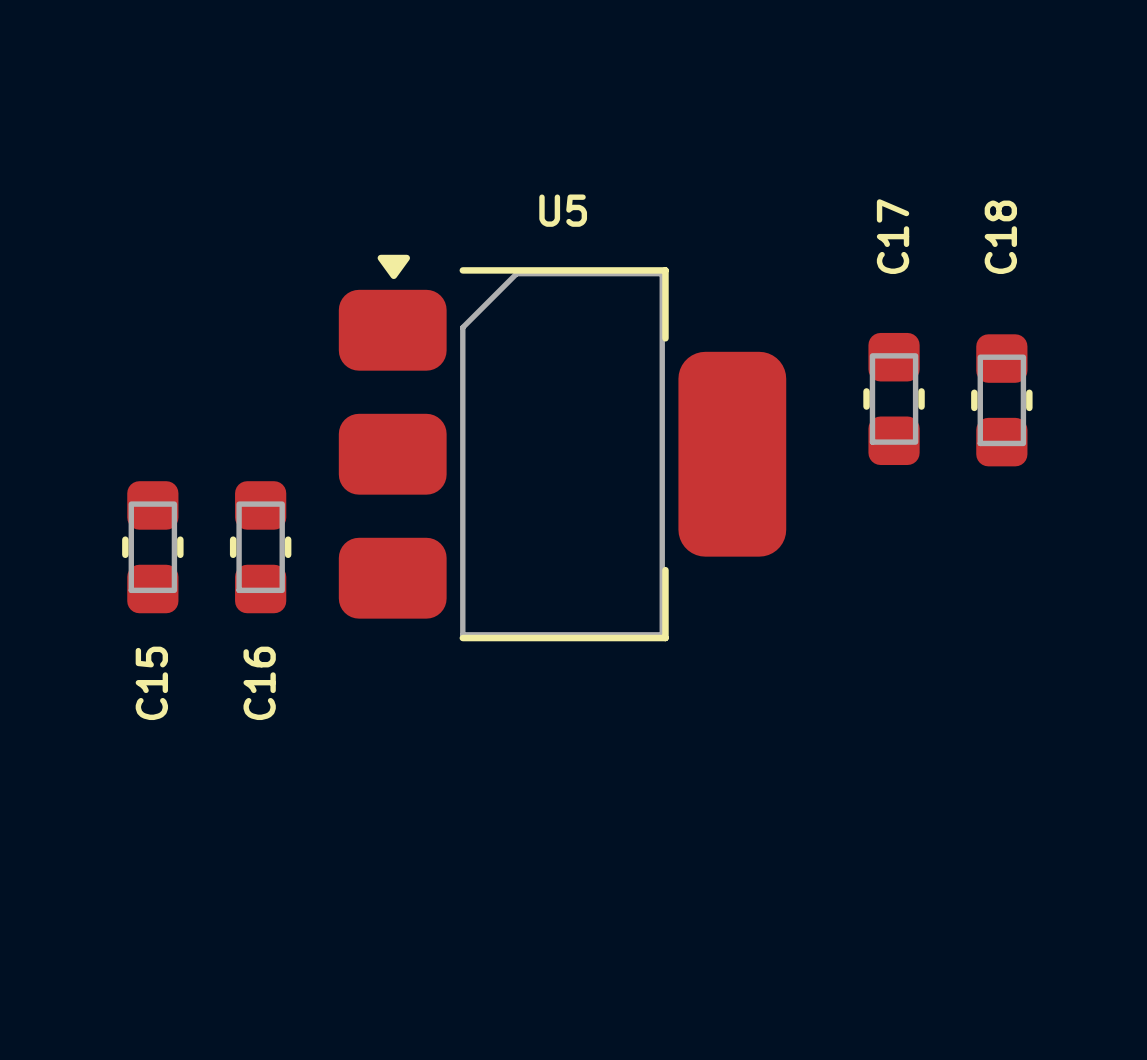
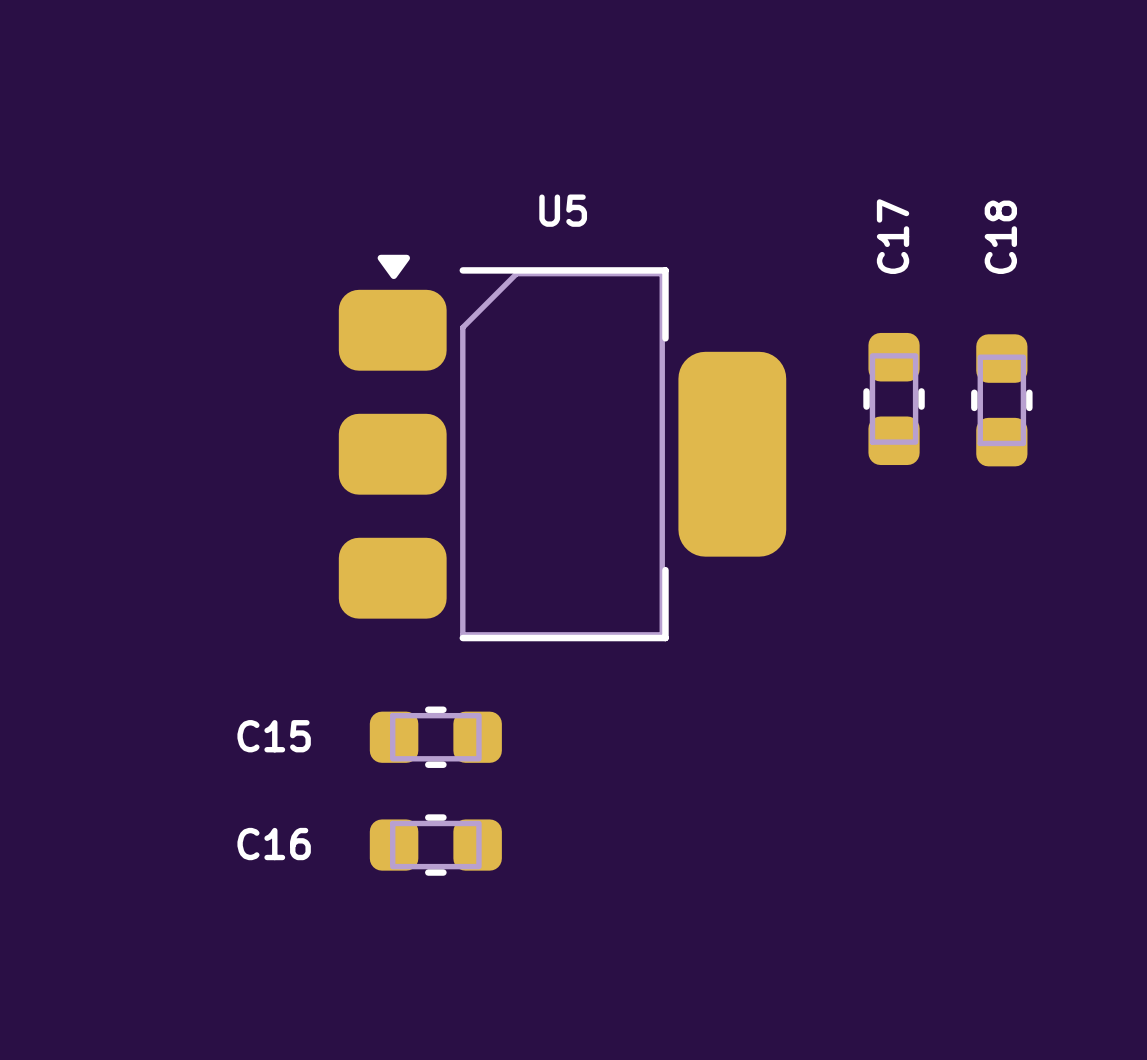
C15 rotation: 0° (152, 547) -> 90° clockwise (435, 737)
C15 position: (152, 547) -> (435, 737)
C16 rotation: 0° (260, 547) -> 90° clockwise (435, 845)
C16 position: (260, 547) -> (435, 845)

